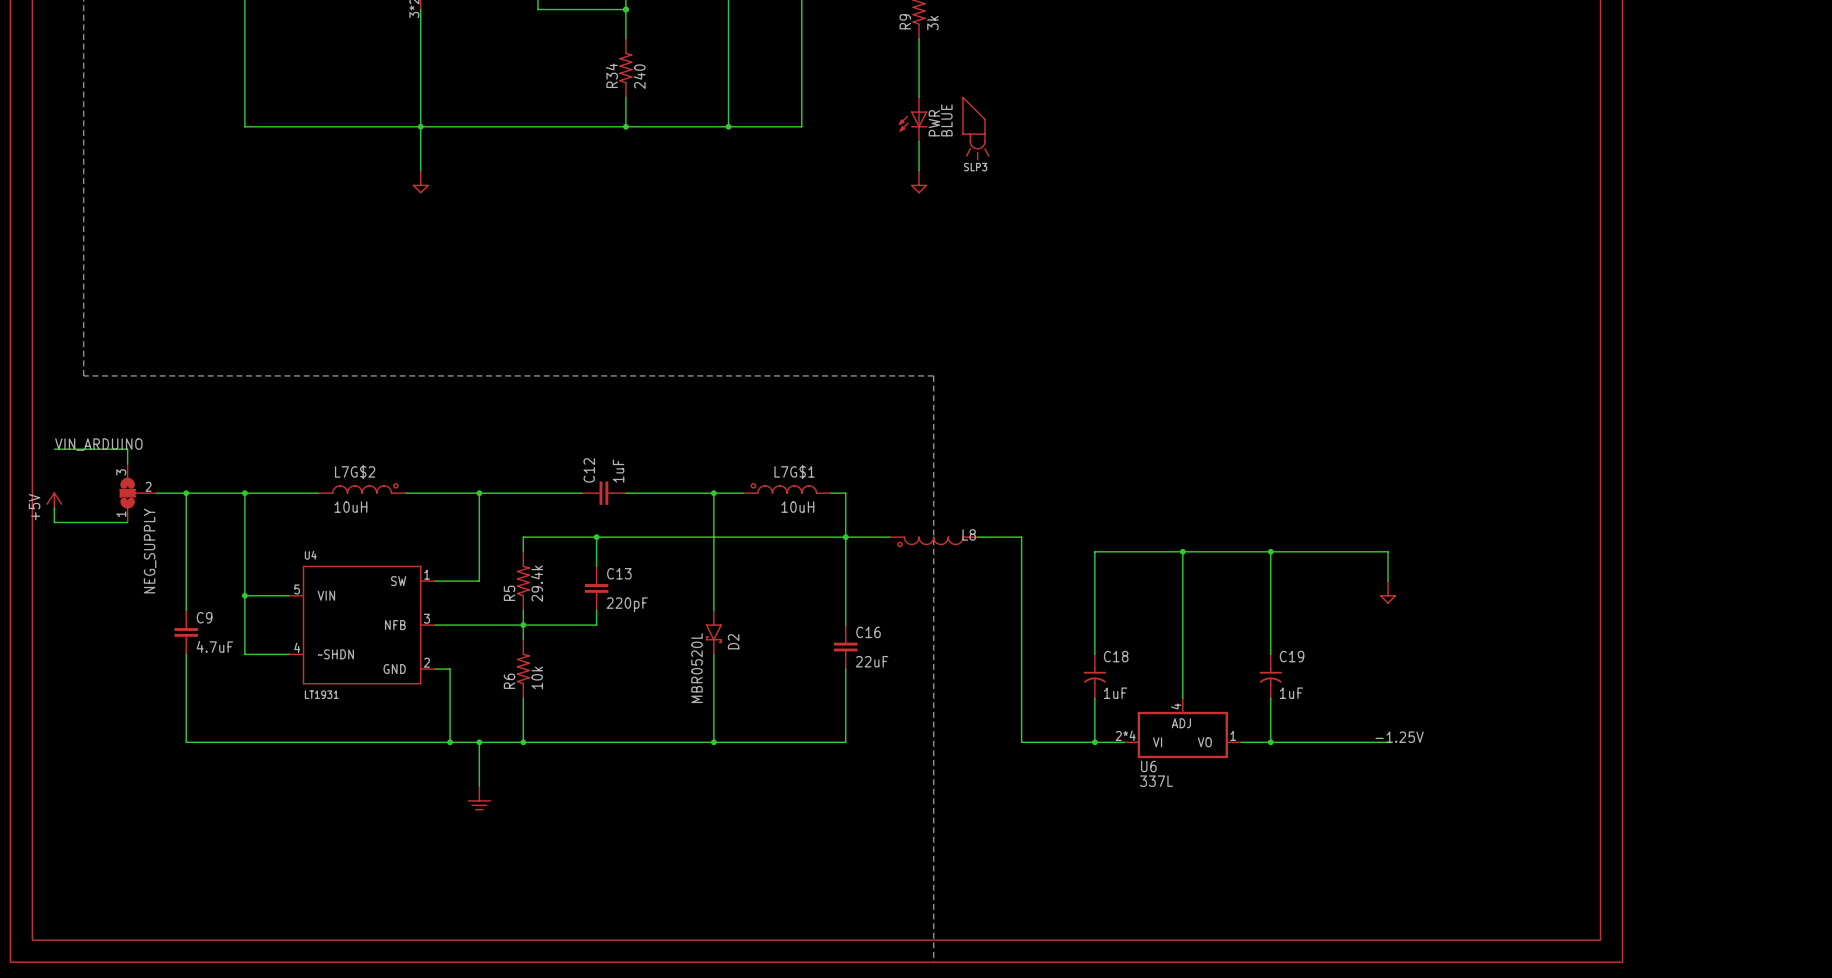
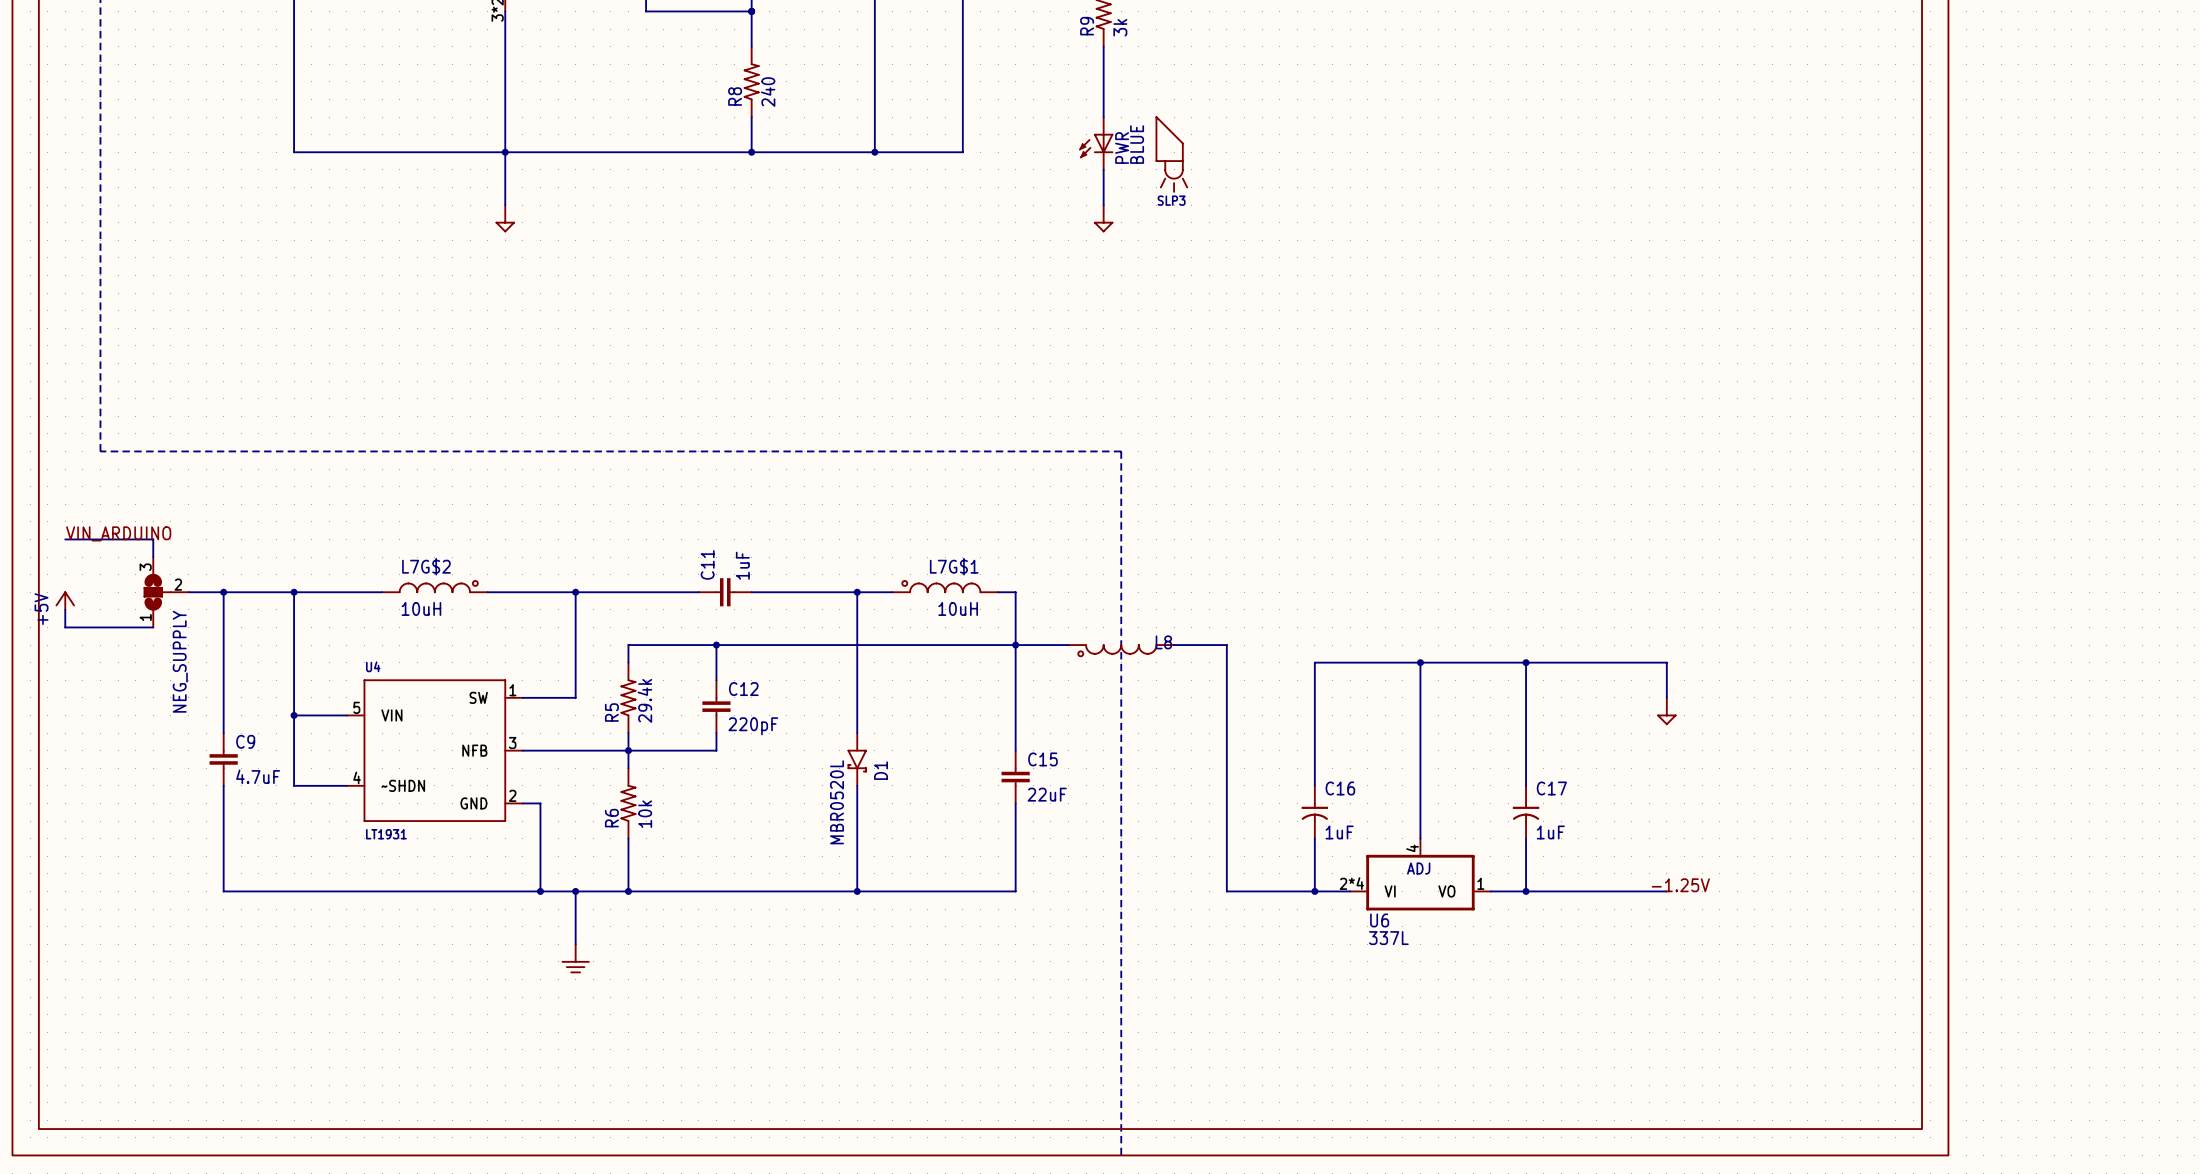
R34 name: R34 (611, 75) -> R8 (735, 96)
C12 name: C12 (589, 470) -> C11 (707, 564)
C13 name: C13 (619, 573) -> C12 (743, 689)
C16 name: C16 (868, 632) -> C15 (1042, 759)
D2 name: D2 (733, 641) -> D1 (881, 770)
C18 name: C18 (1116, 656) -> C16 (1340, 788)
C19 name: C19 (1292, 656) -> C17 (1551, 788)

